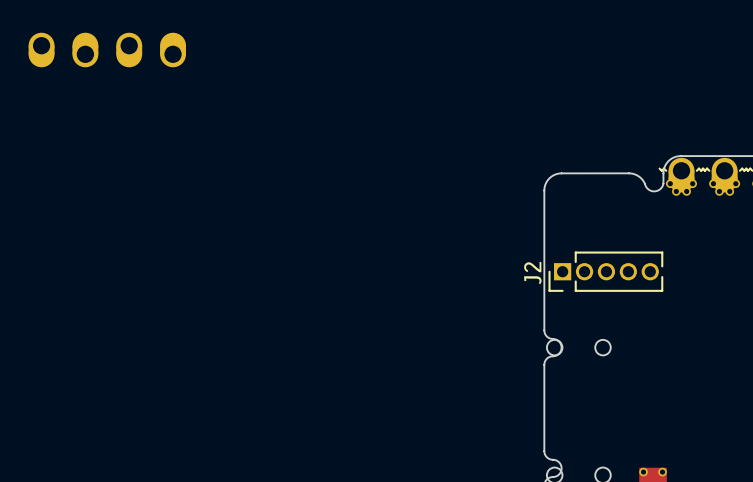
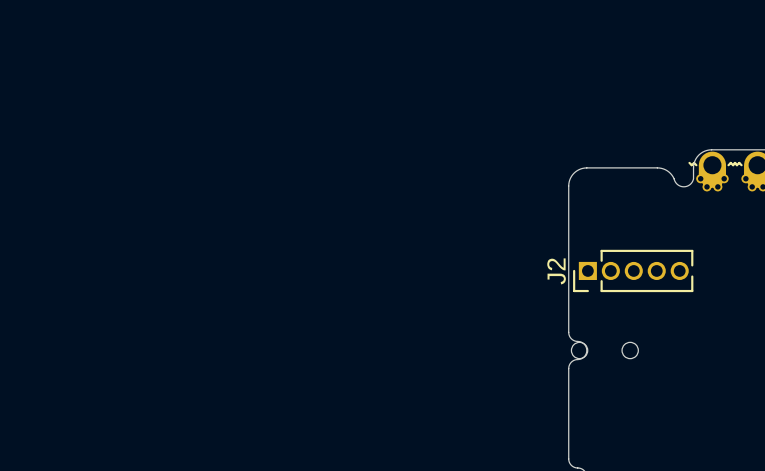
part: (107, 50) -> none

